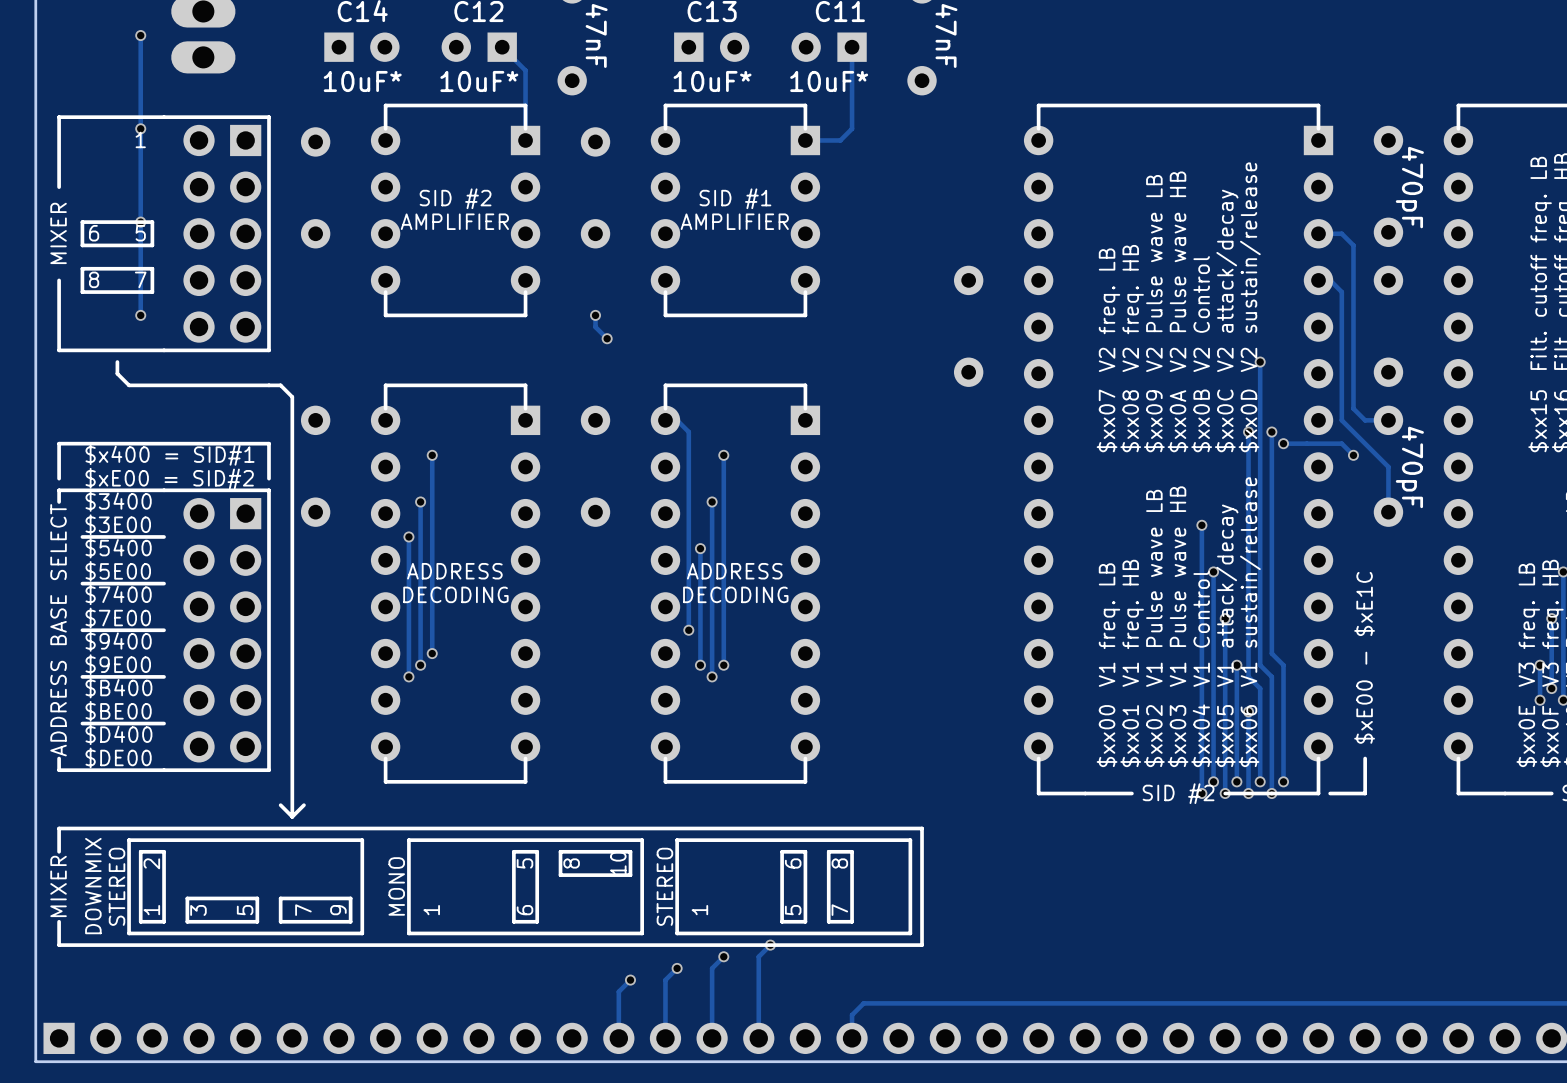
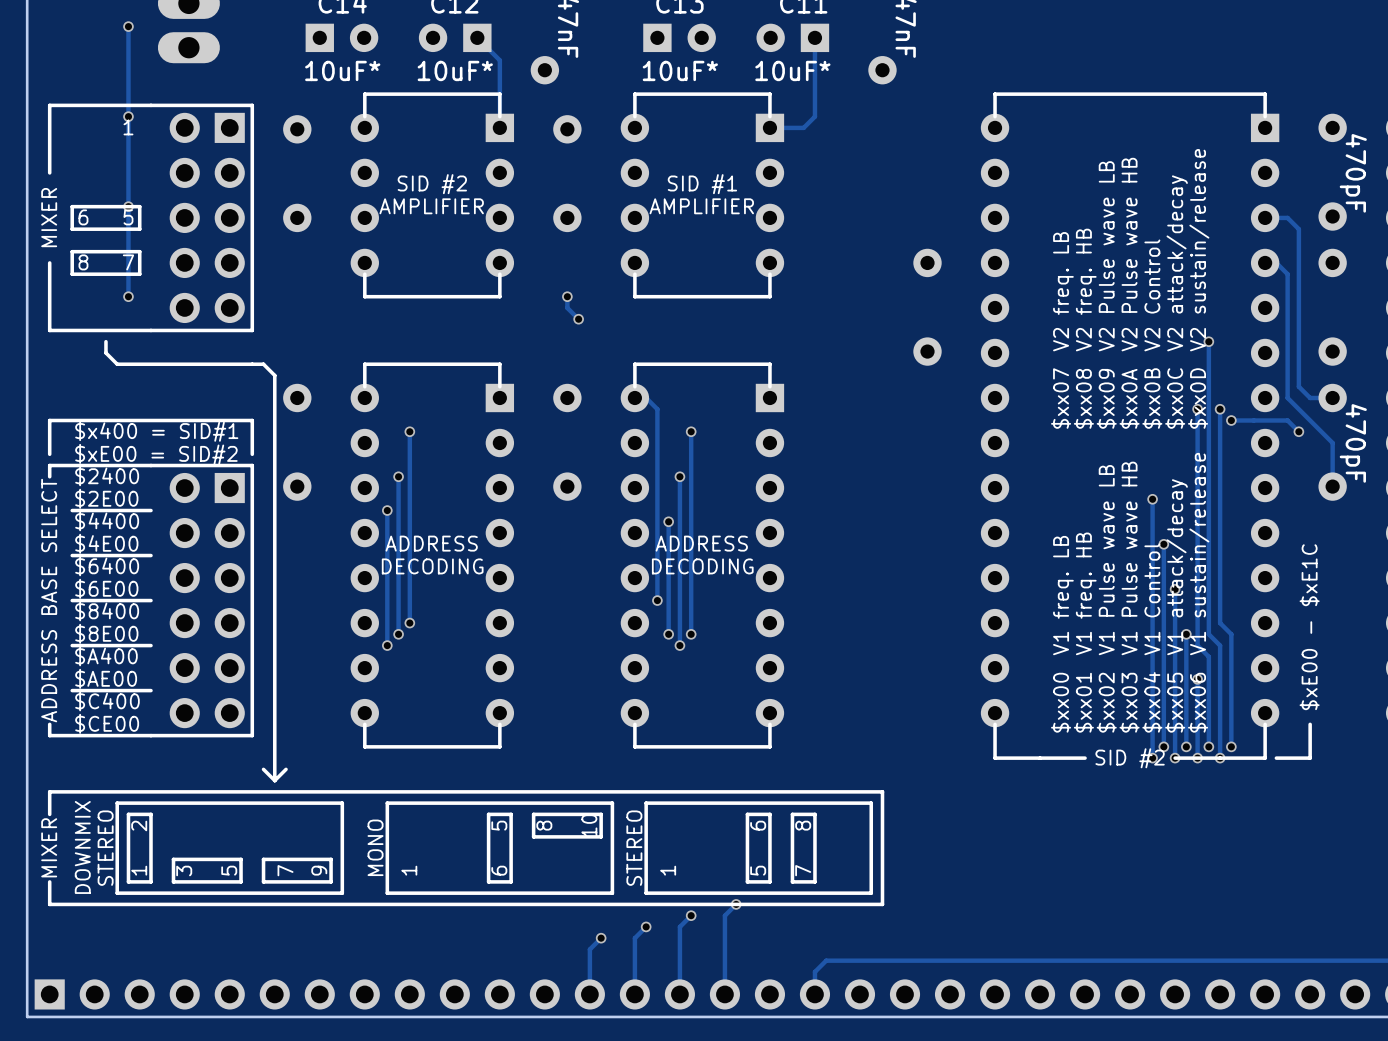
text: $3400 (118, 501) -> $2400 (107, 476)
text: $3E00 (118, 524) -> $2E00 (106, 498)
text: $5400 (118, 548) -> $4400 (107, 521)
text: $5E00 (118, 571) -> $4E00 (106, 543)
text: $7400 (118, 594) -> $6400 (107, 566)
text: $7E00 (118, 618) -> $6E00 (106, 588)
text: $9400 (118, 641) -> $8400 (107, 611)
text: $9E00 (118, 664) -> $8E00 (106, 633)
text: $B400 (118, 688) -> $A400 (106, 656)
text: $BE00 (118, 711) -> $AE00 (106, 678)
text: $D400 (118, 734) -> $C400 (107, 701)
text: $DE00 (118, 757) -> $CE00 (107, 723)

